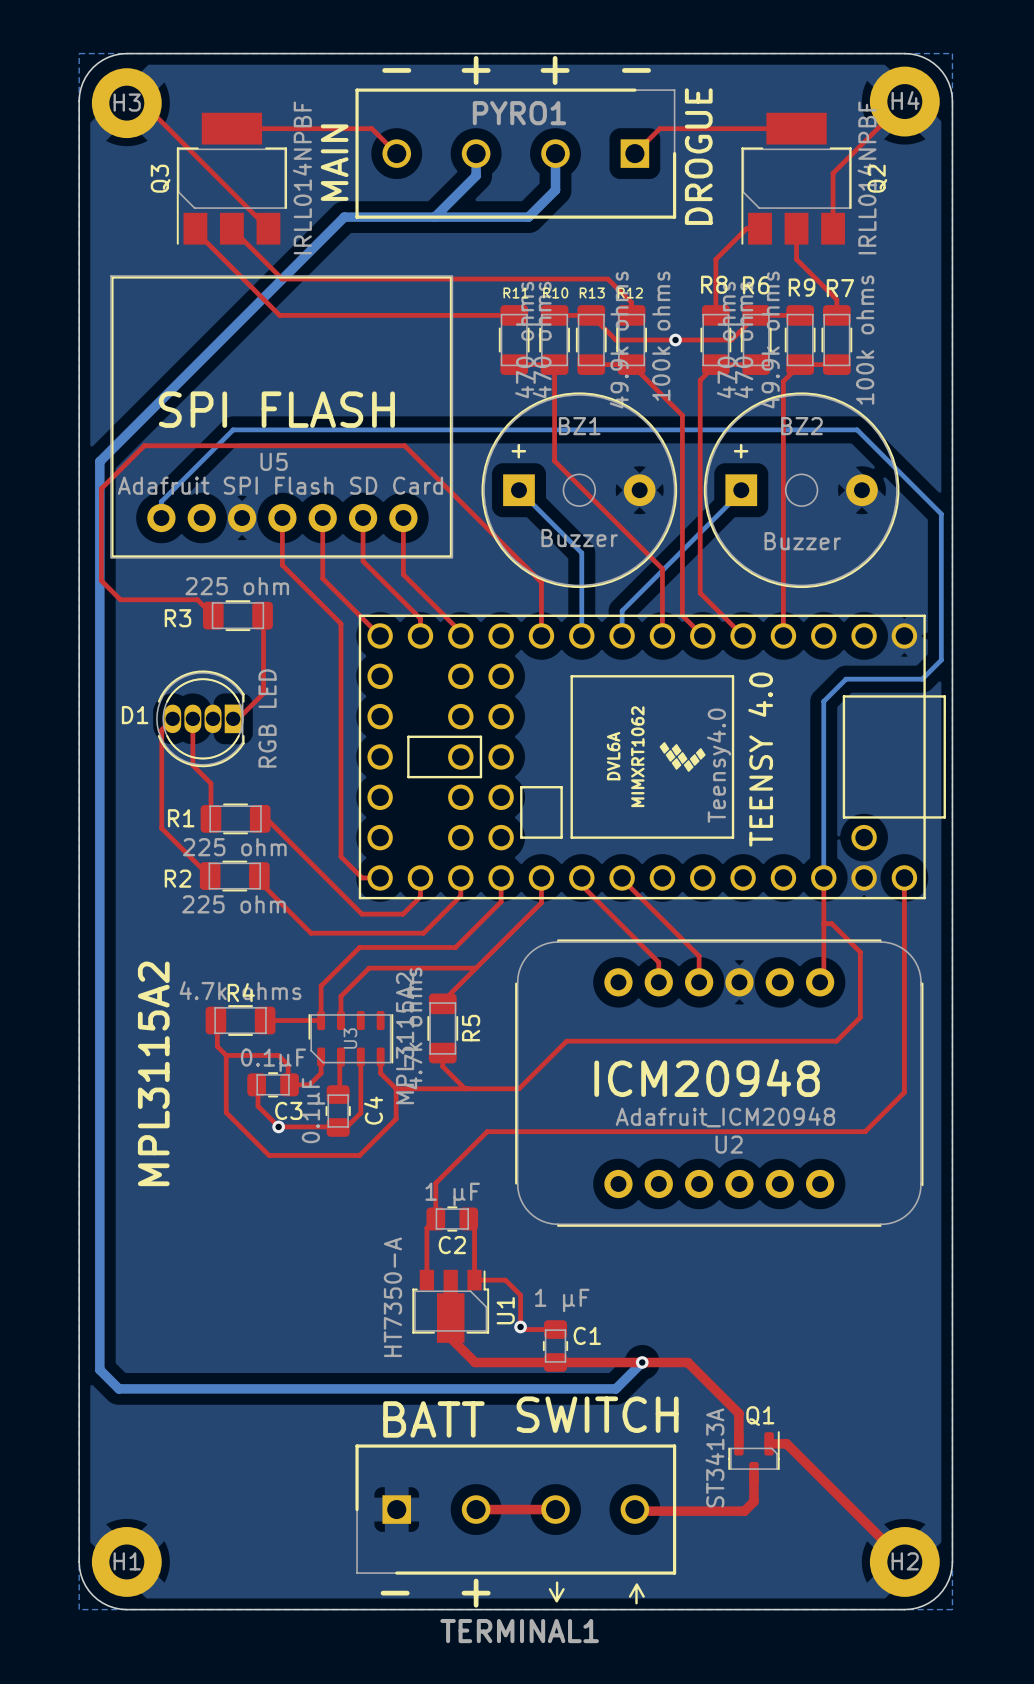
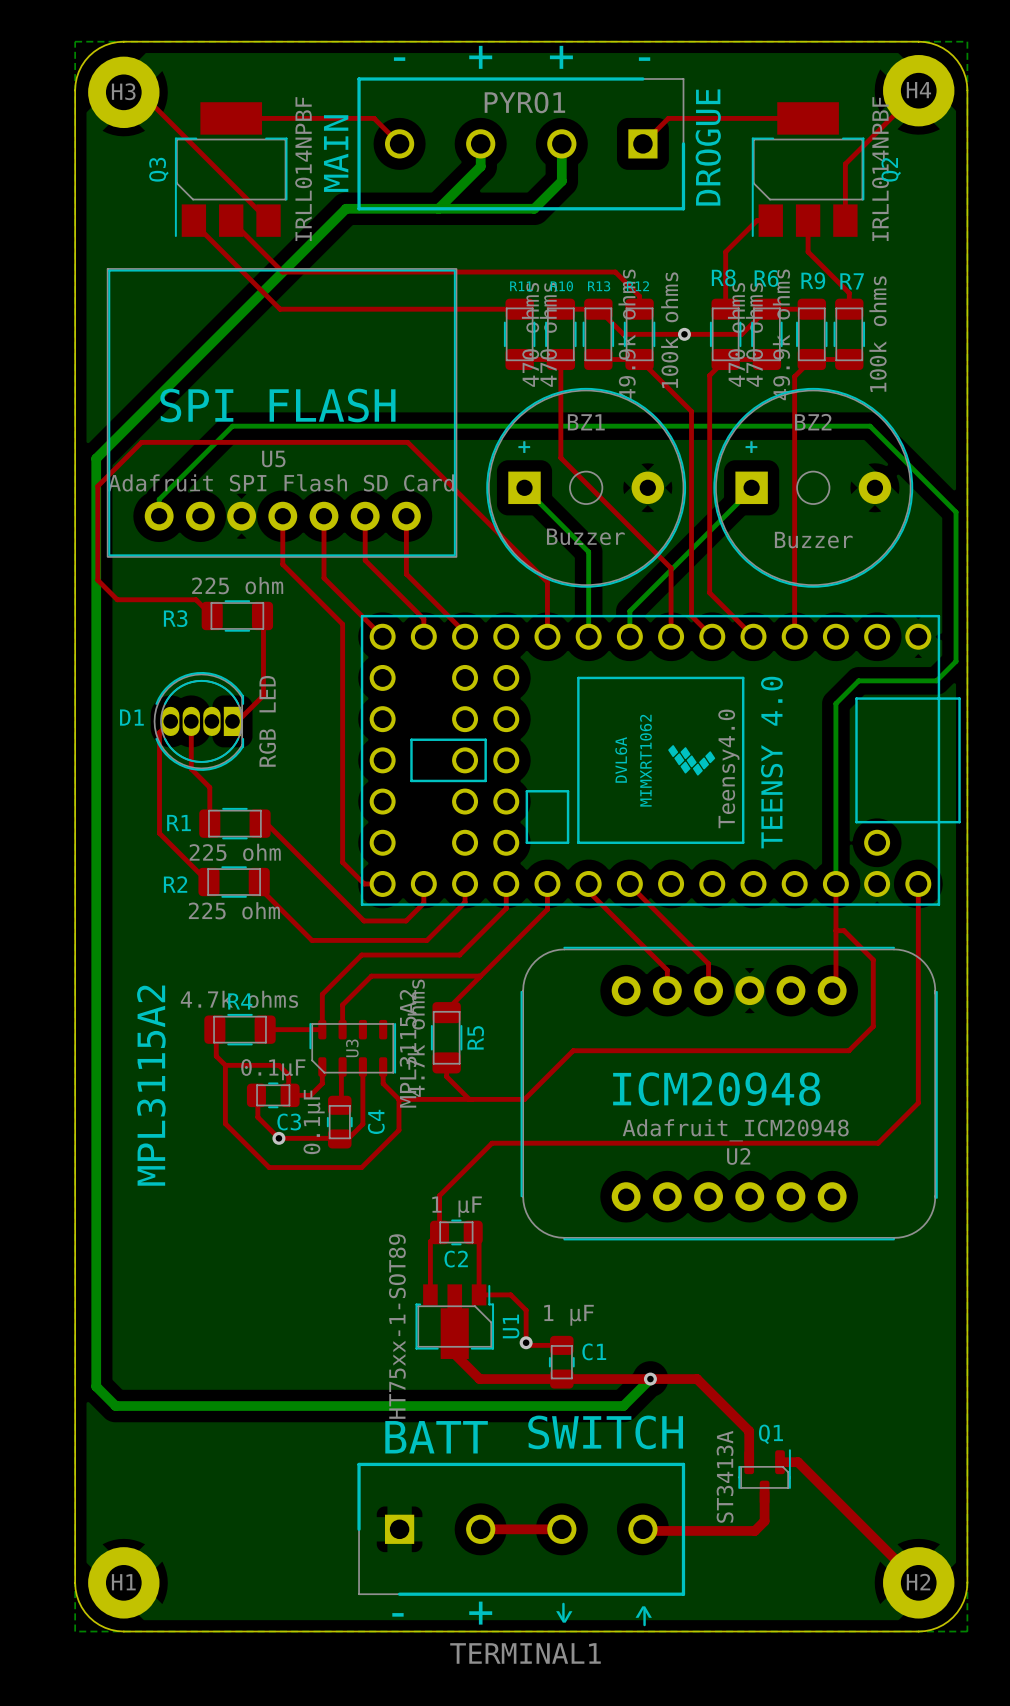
U1 value: HT7350-A (392, 1297) -> HT75xx-1-SOT89 (397, 1326)

